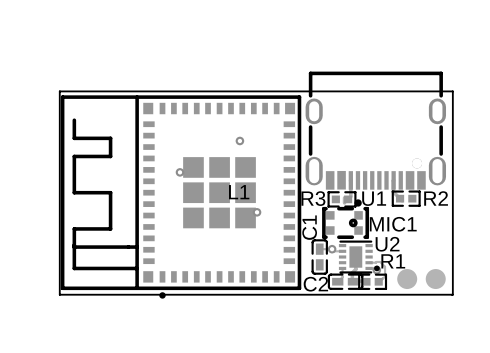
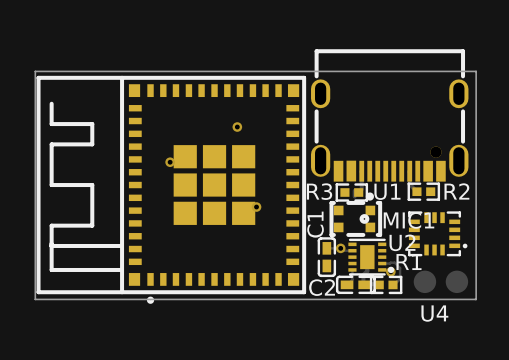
L1 name: L1 (239, 192) -> none
U4: none -> (437, 233)

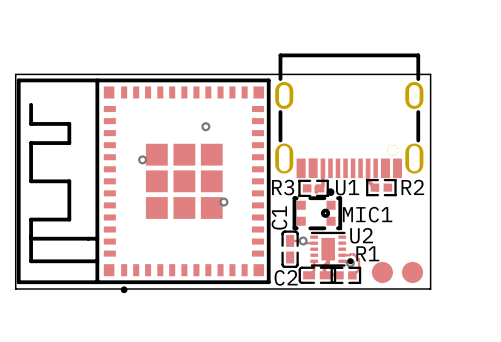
U4: (437, 233) -> none

